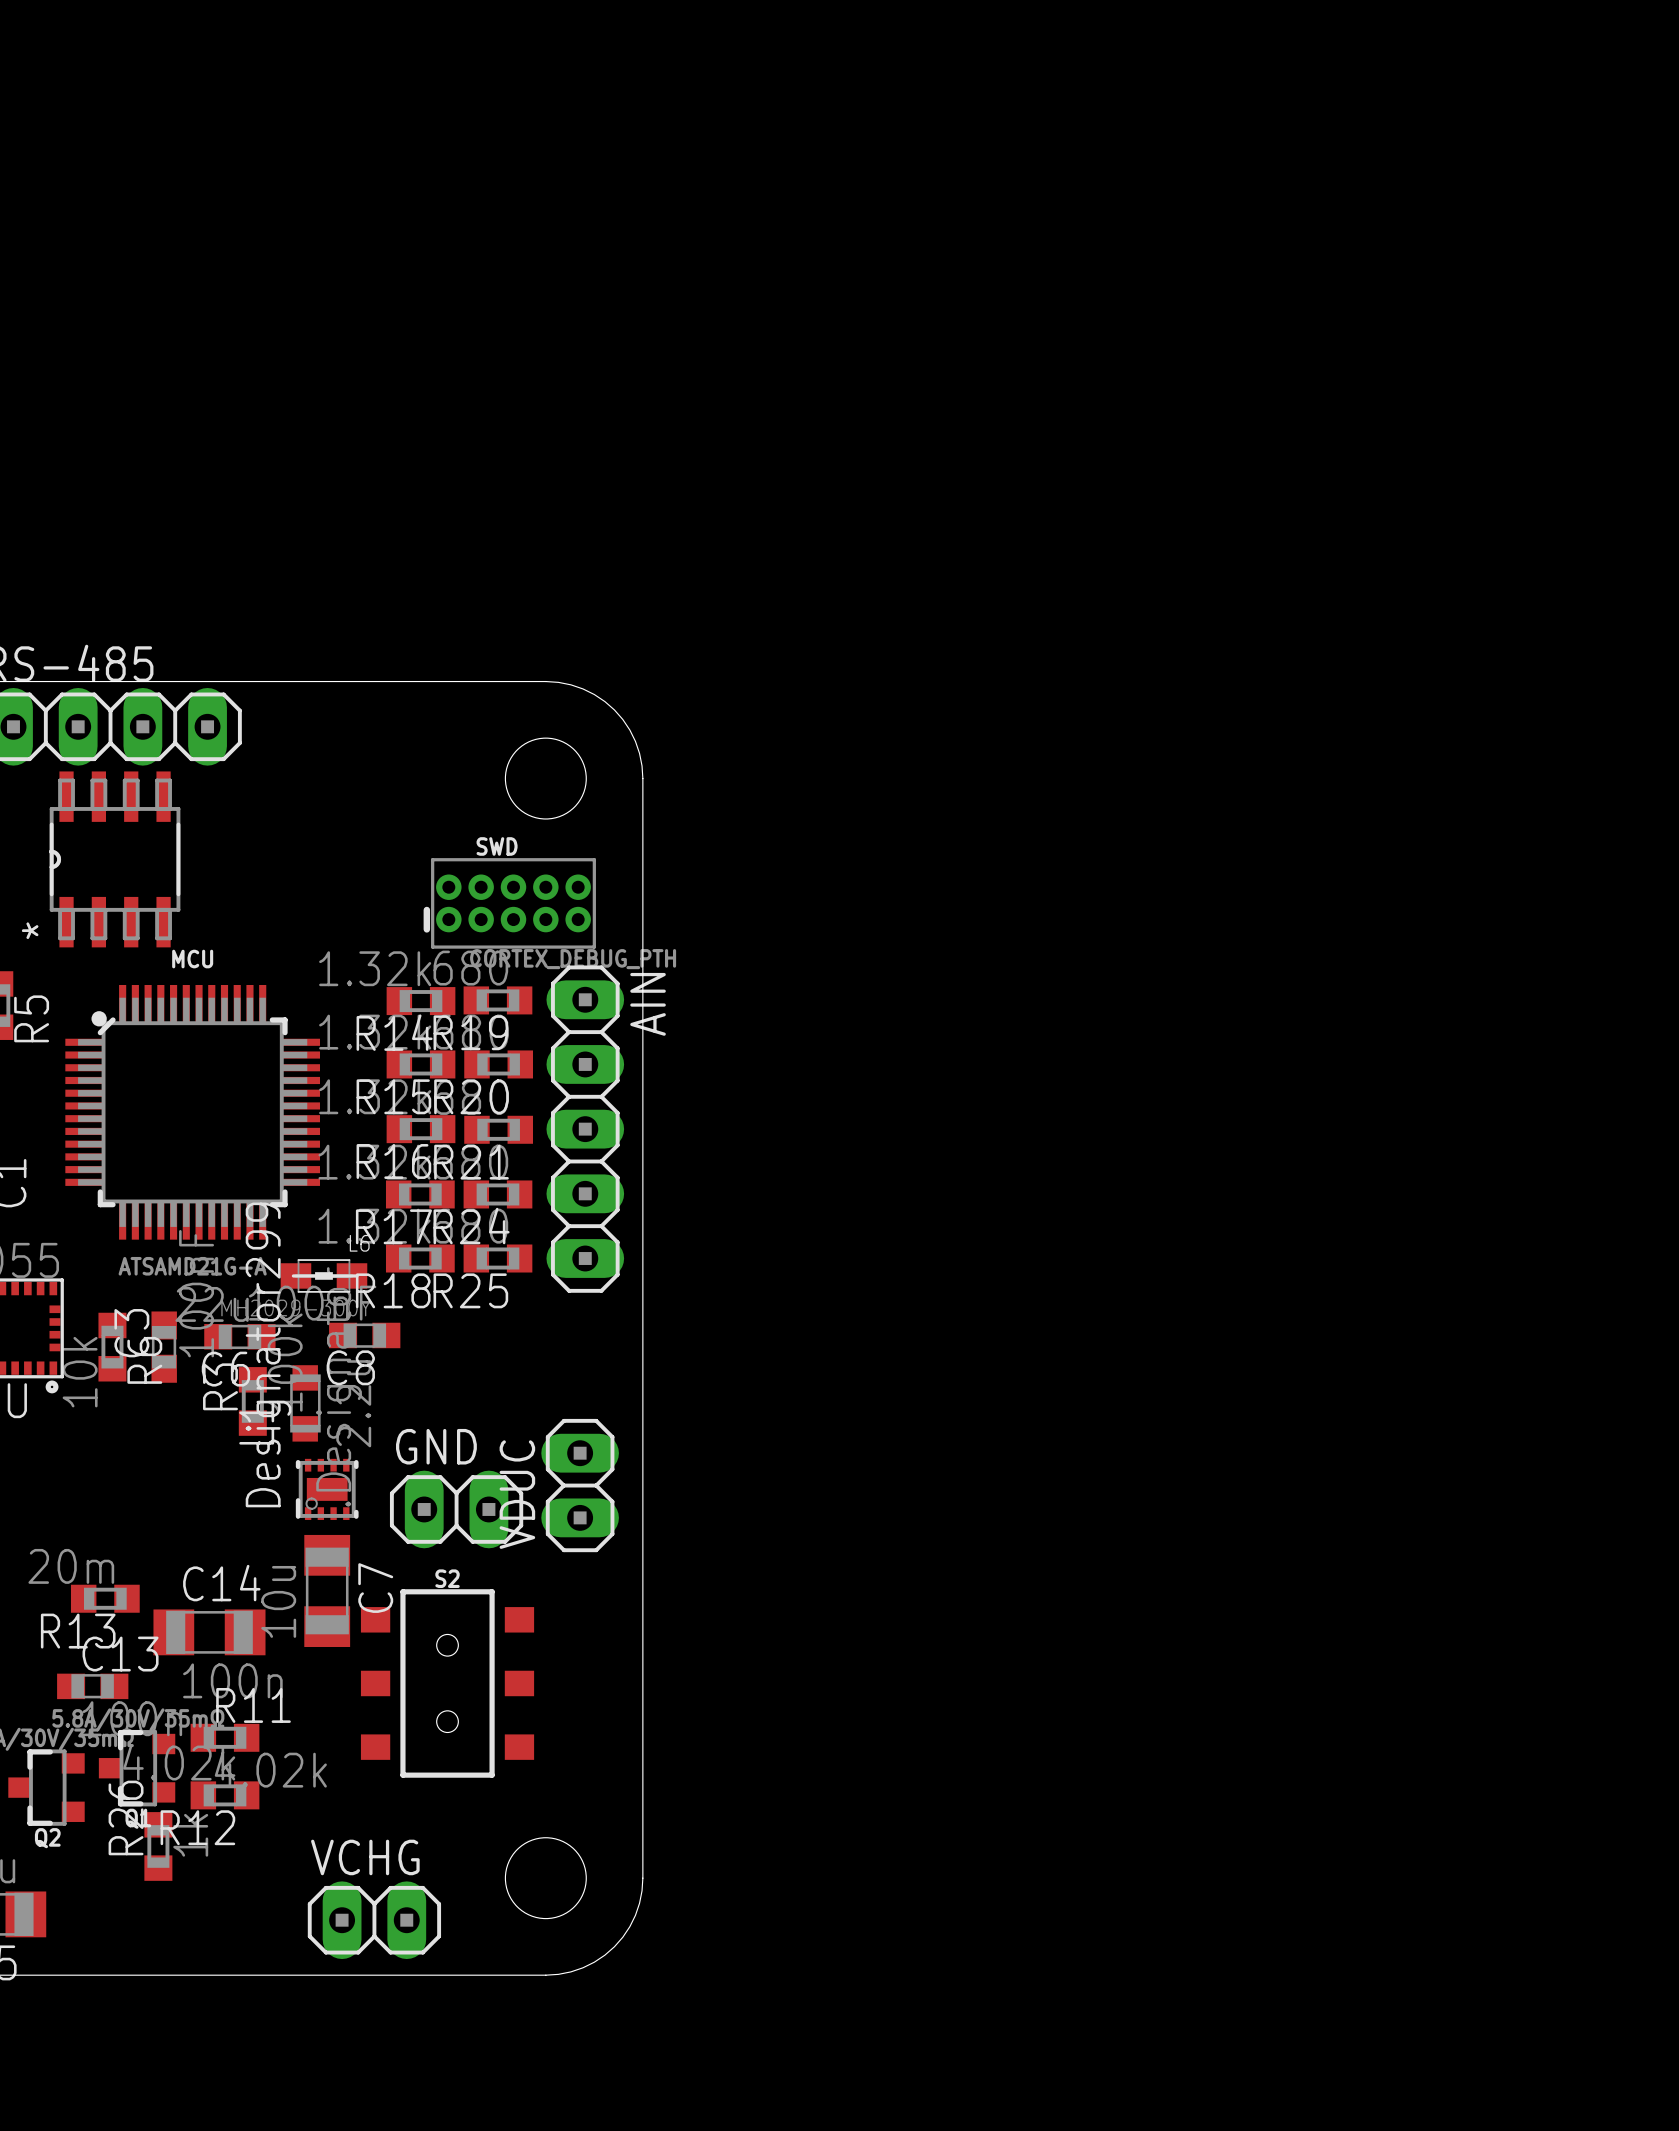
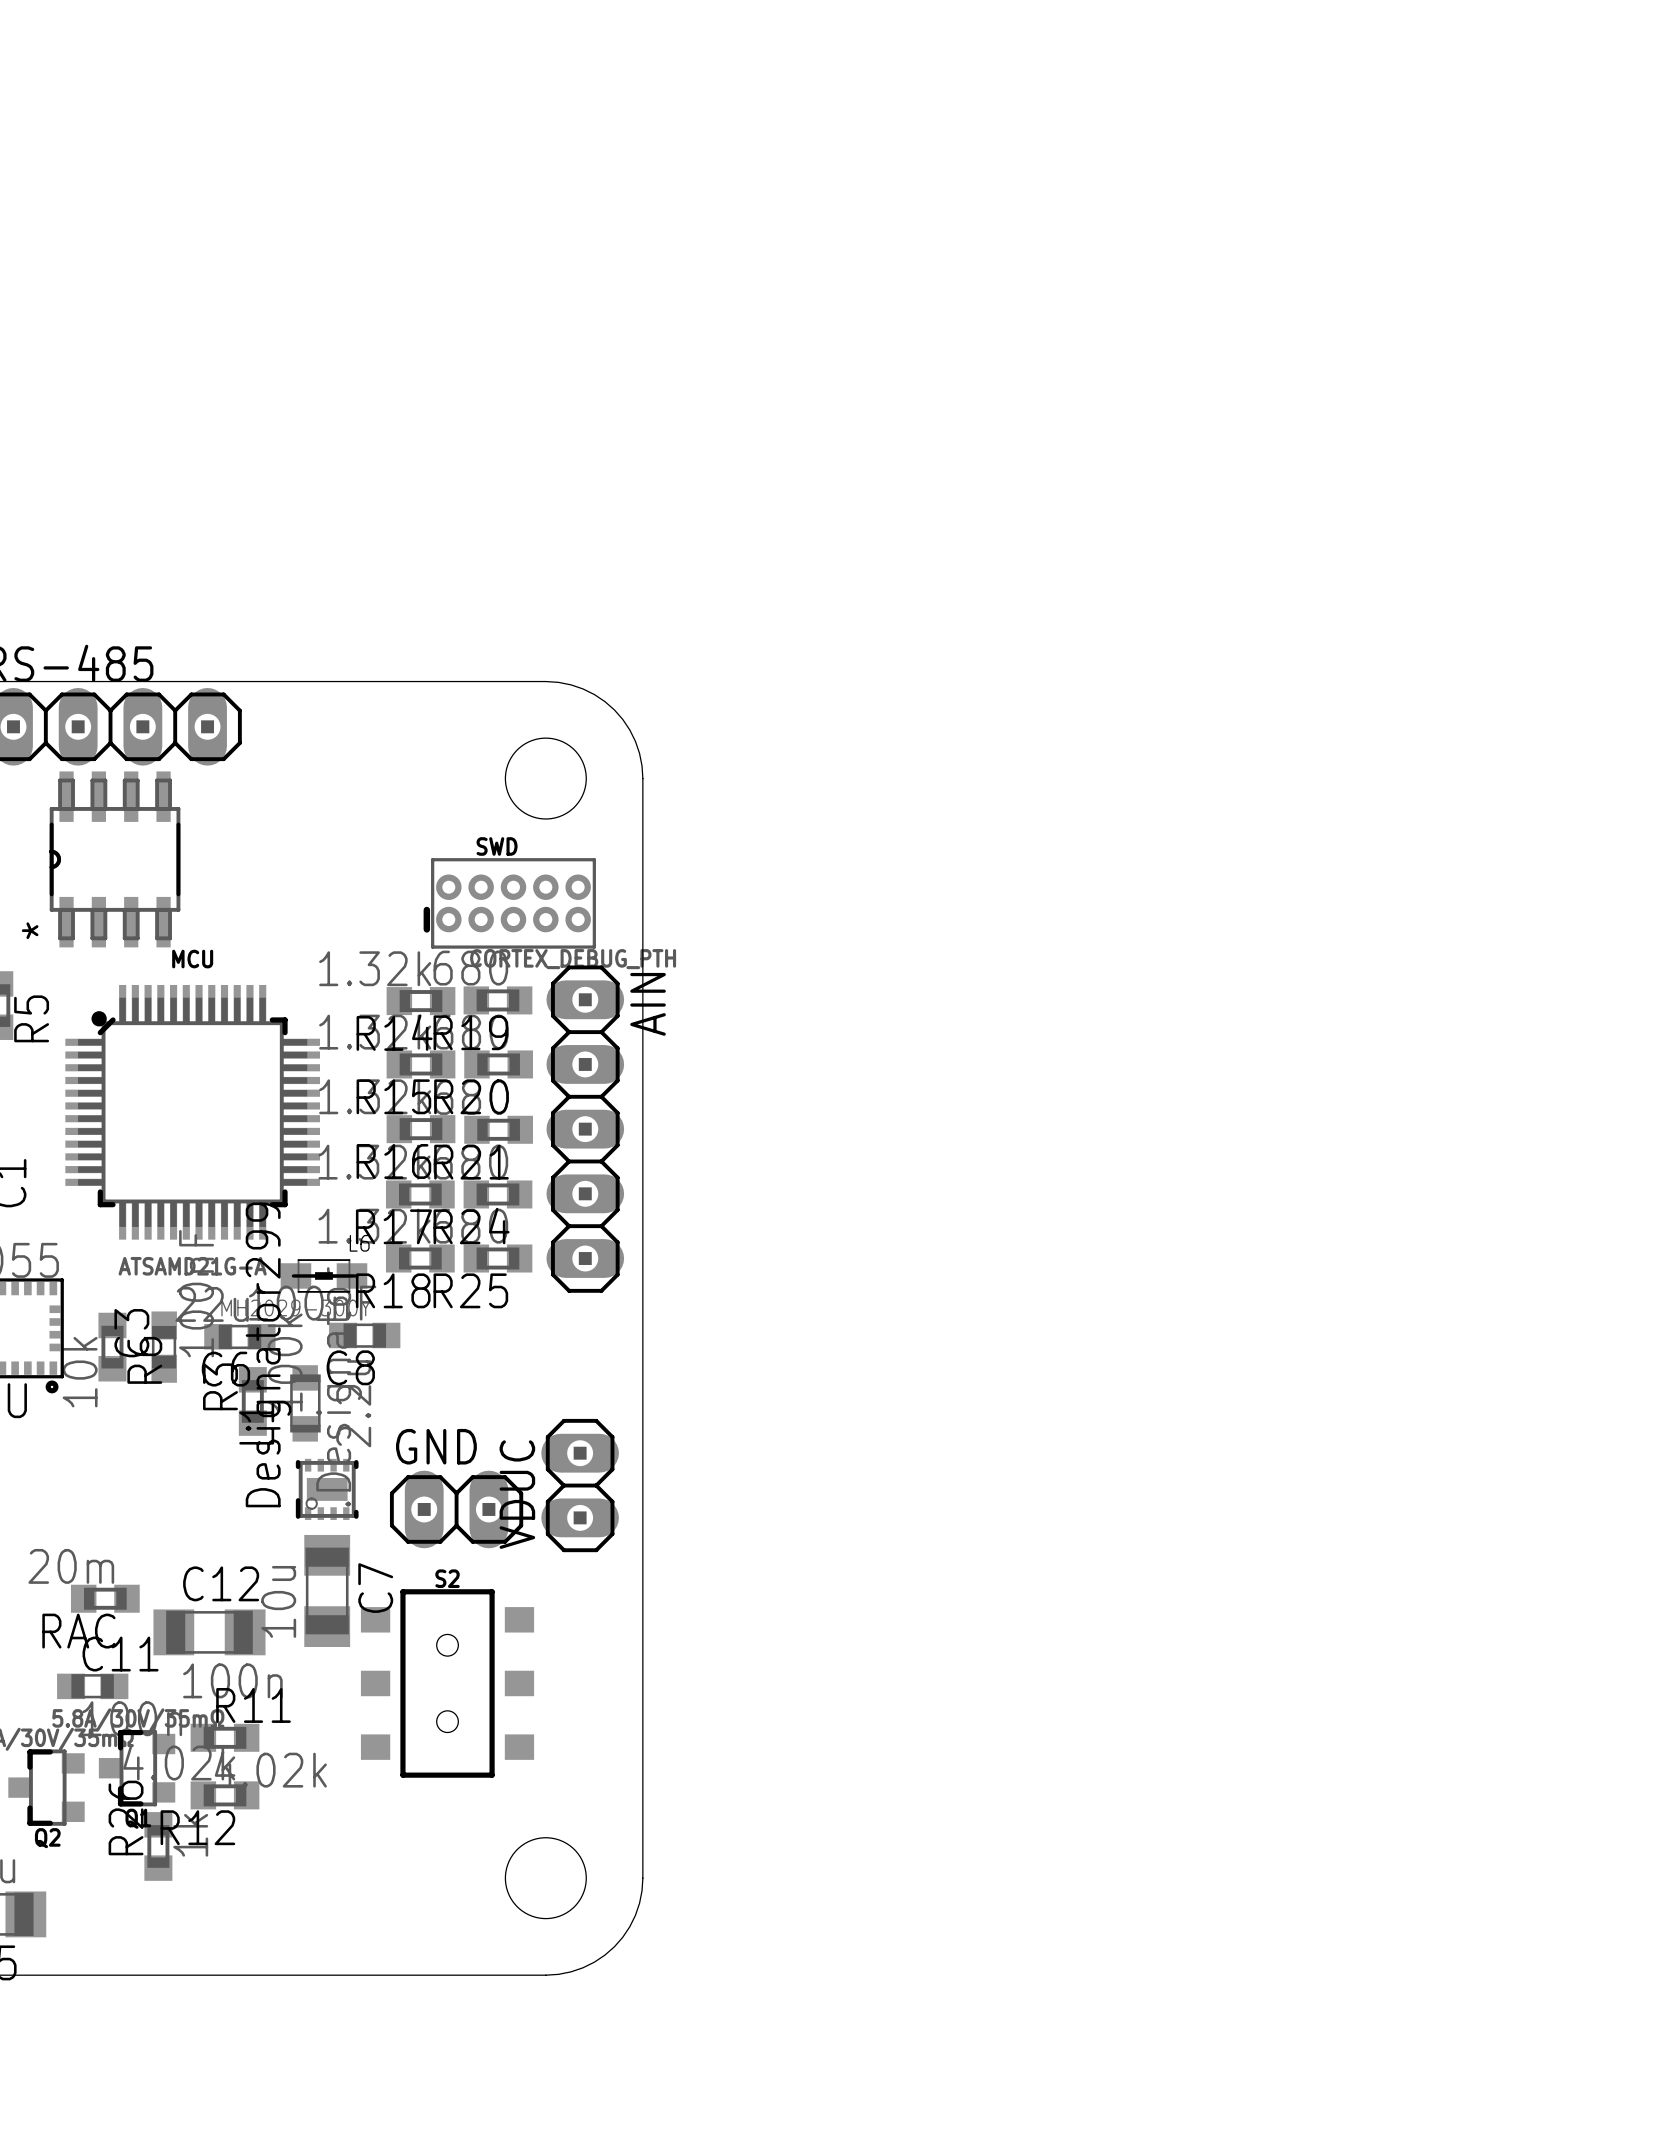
C14 name: C14 (221, 1583) -> C12 (221, 1583)
R13 name: R13 (78, 1631) -> RAC (78, 1631)
C13 name: C13 (120, 1654) -> C11 (120, 1654)
VCHG: (374, 1920) -> none

